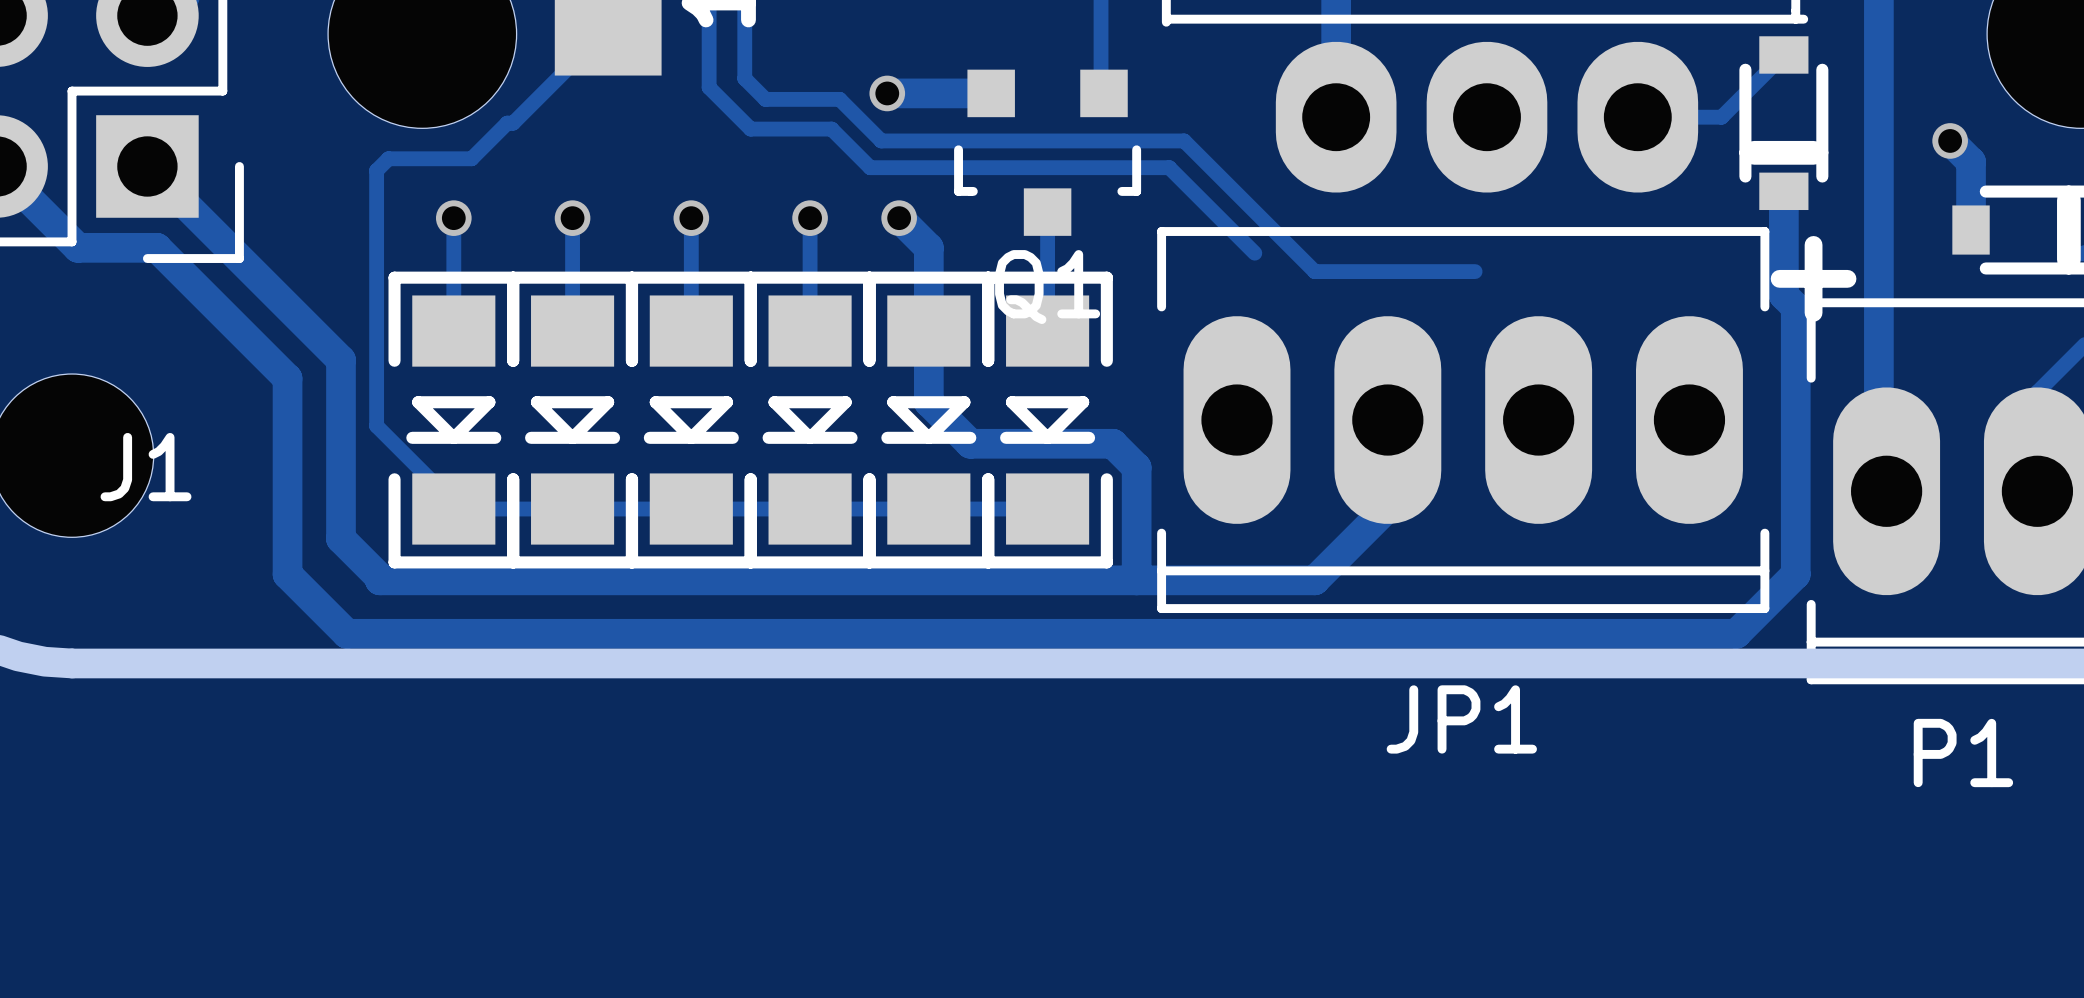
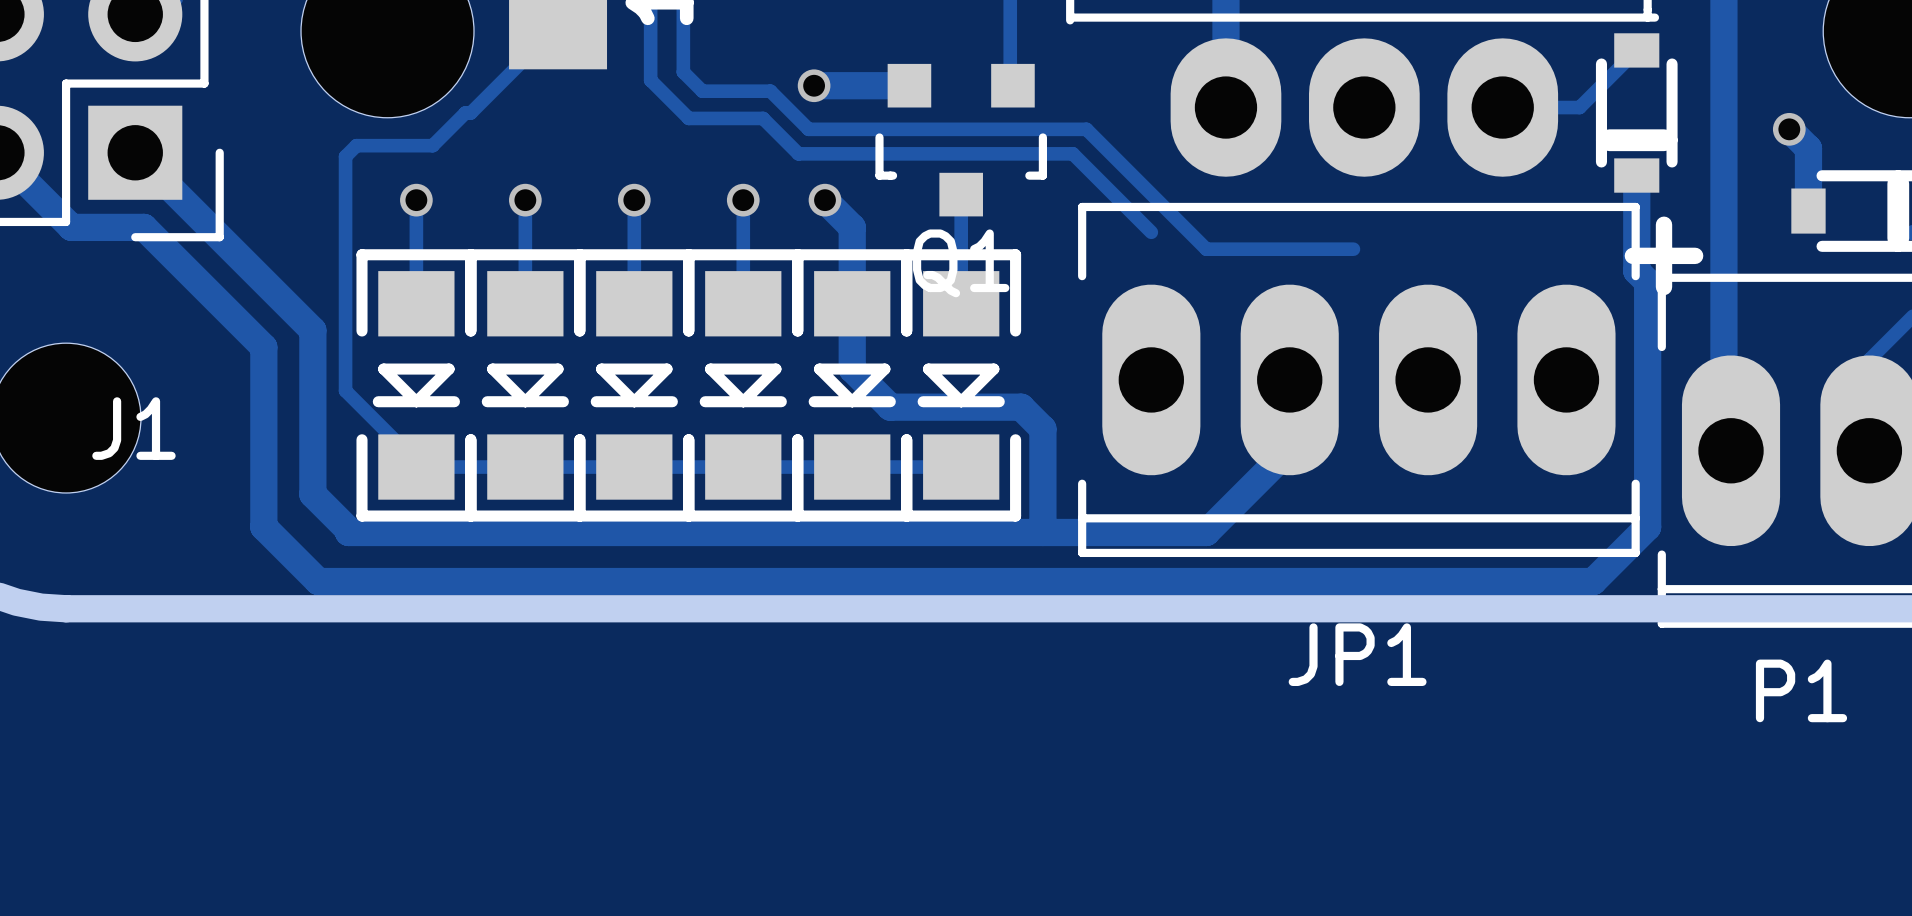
JP1 position: (1463, 420) -> (1358, 379)

